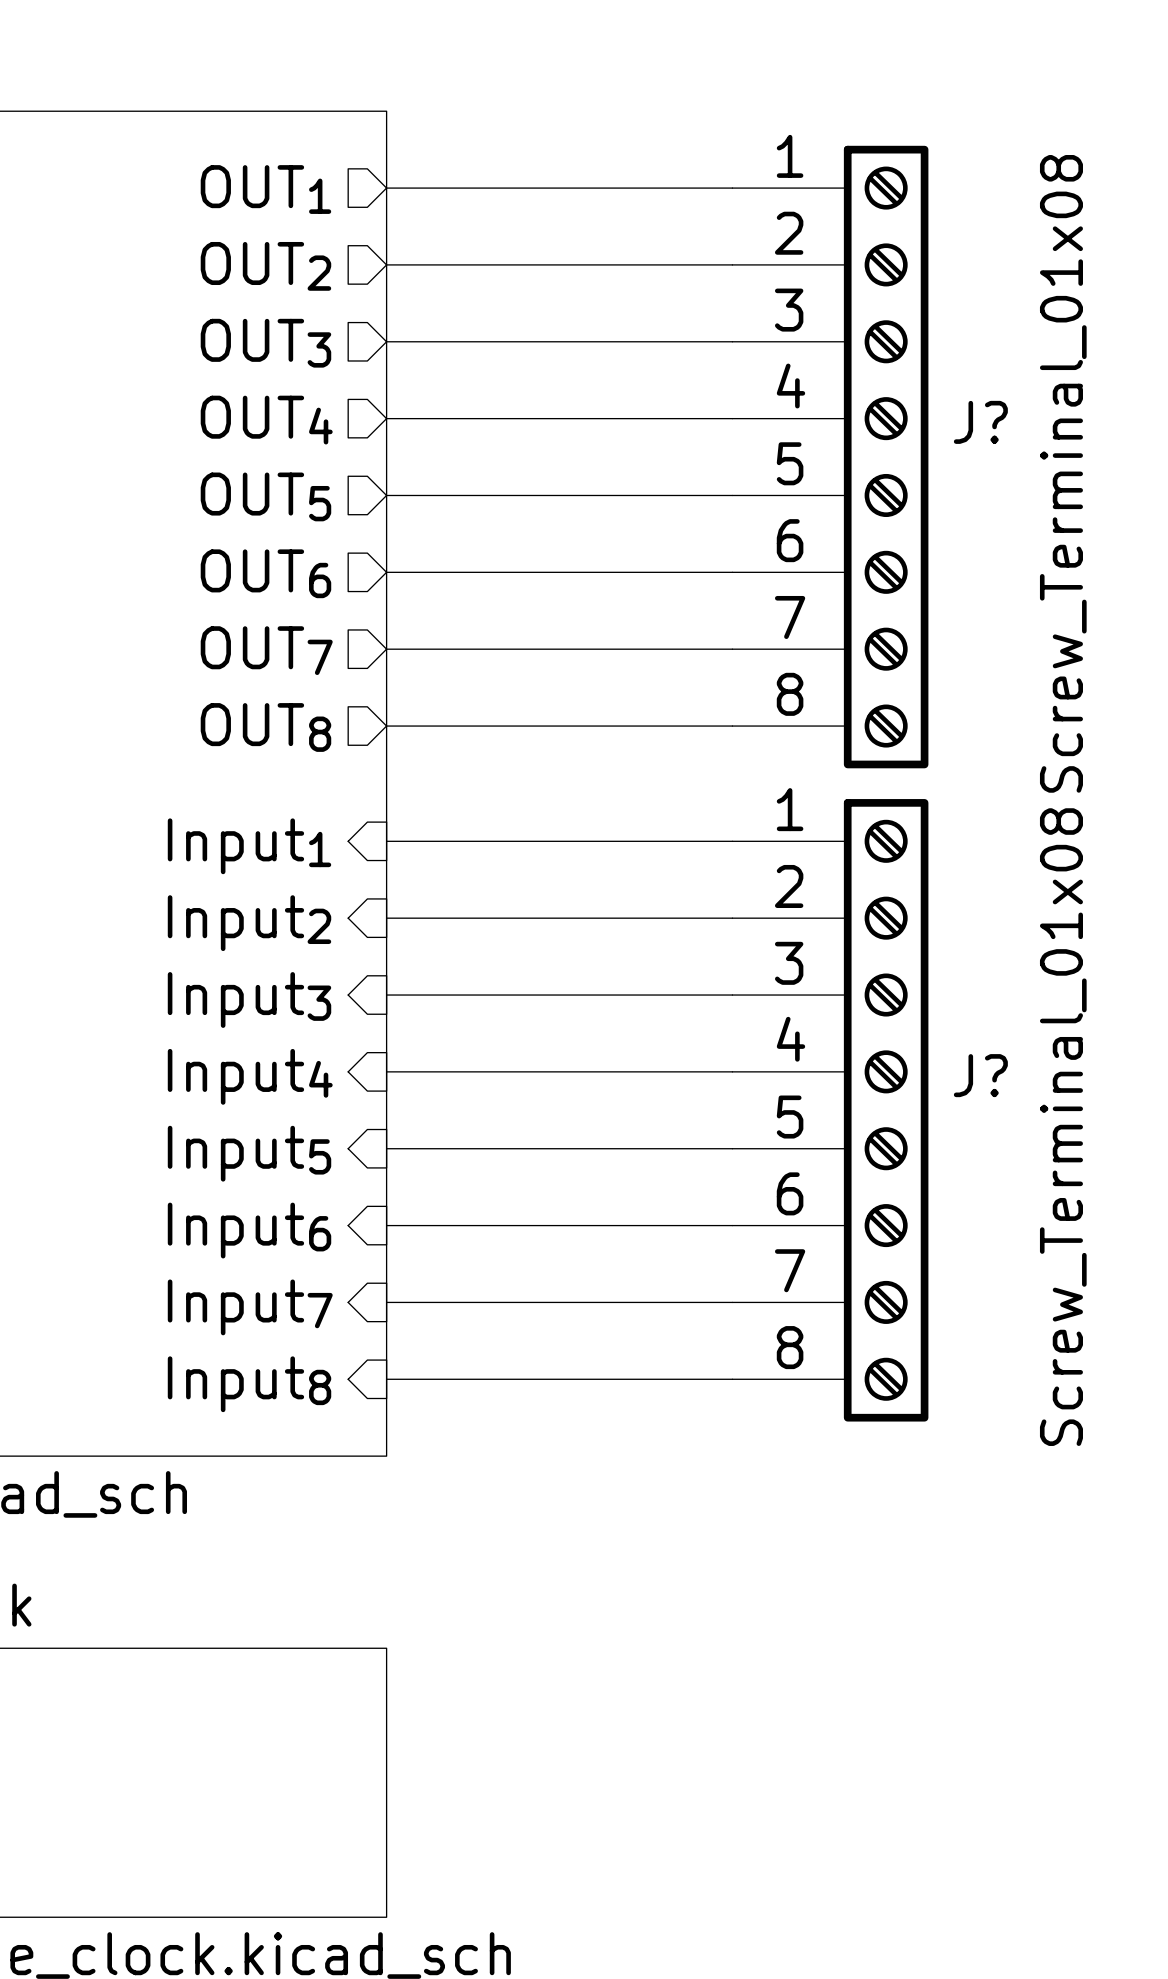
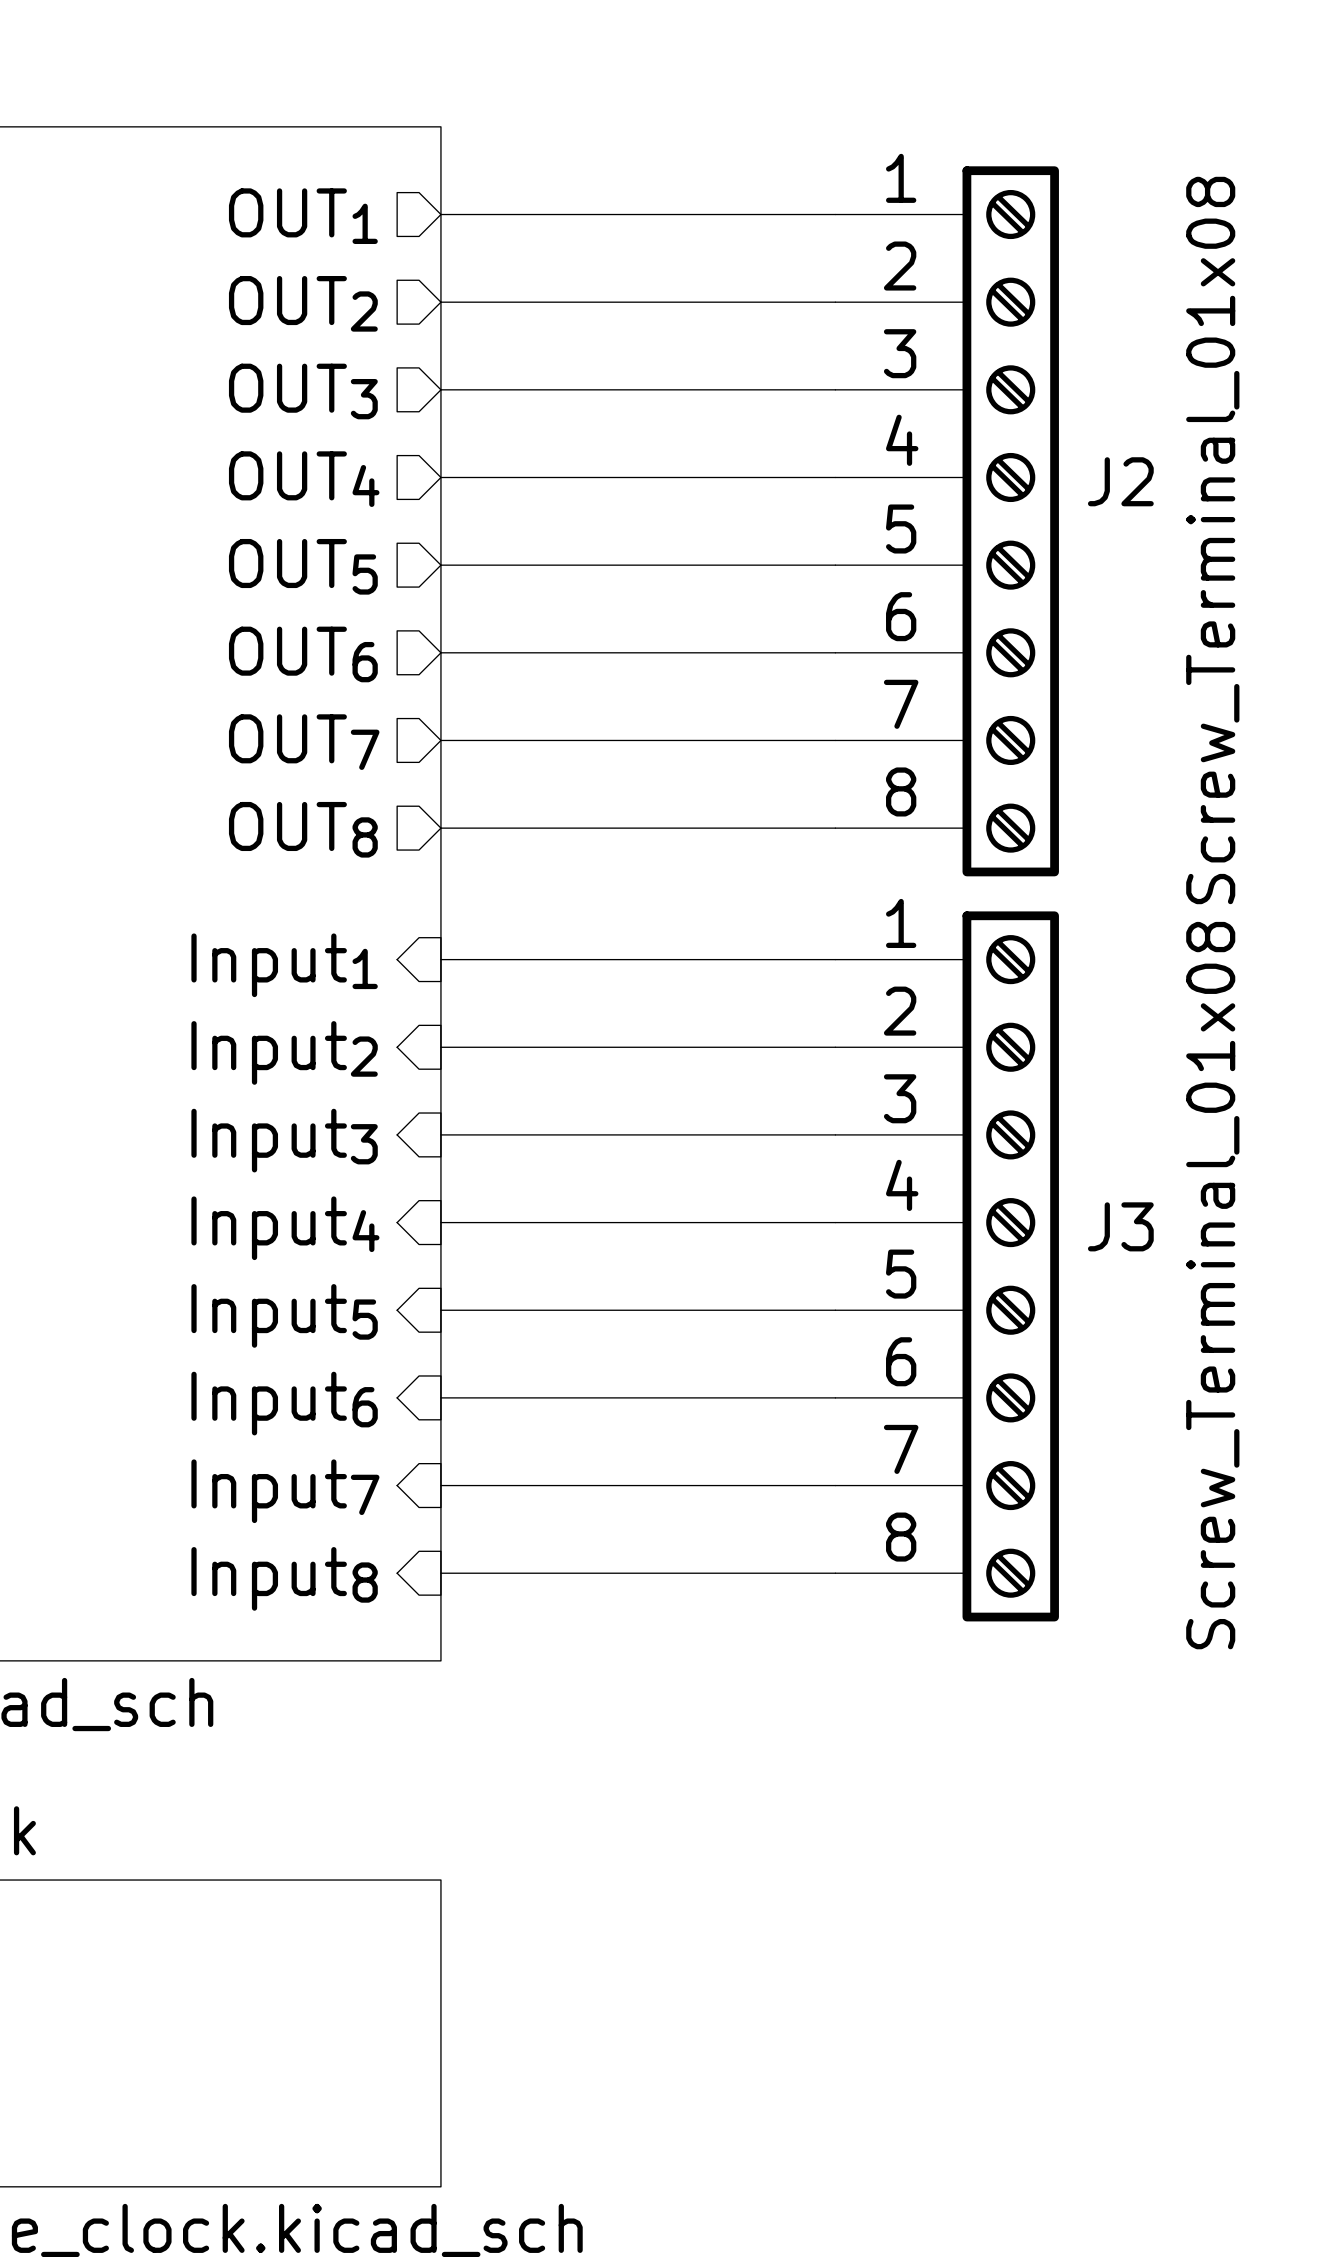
J? name: J? (980, 422) -> J2 (1120, 481)
J? name: J? (980, 1075) -> J3 (1120, 1226)

